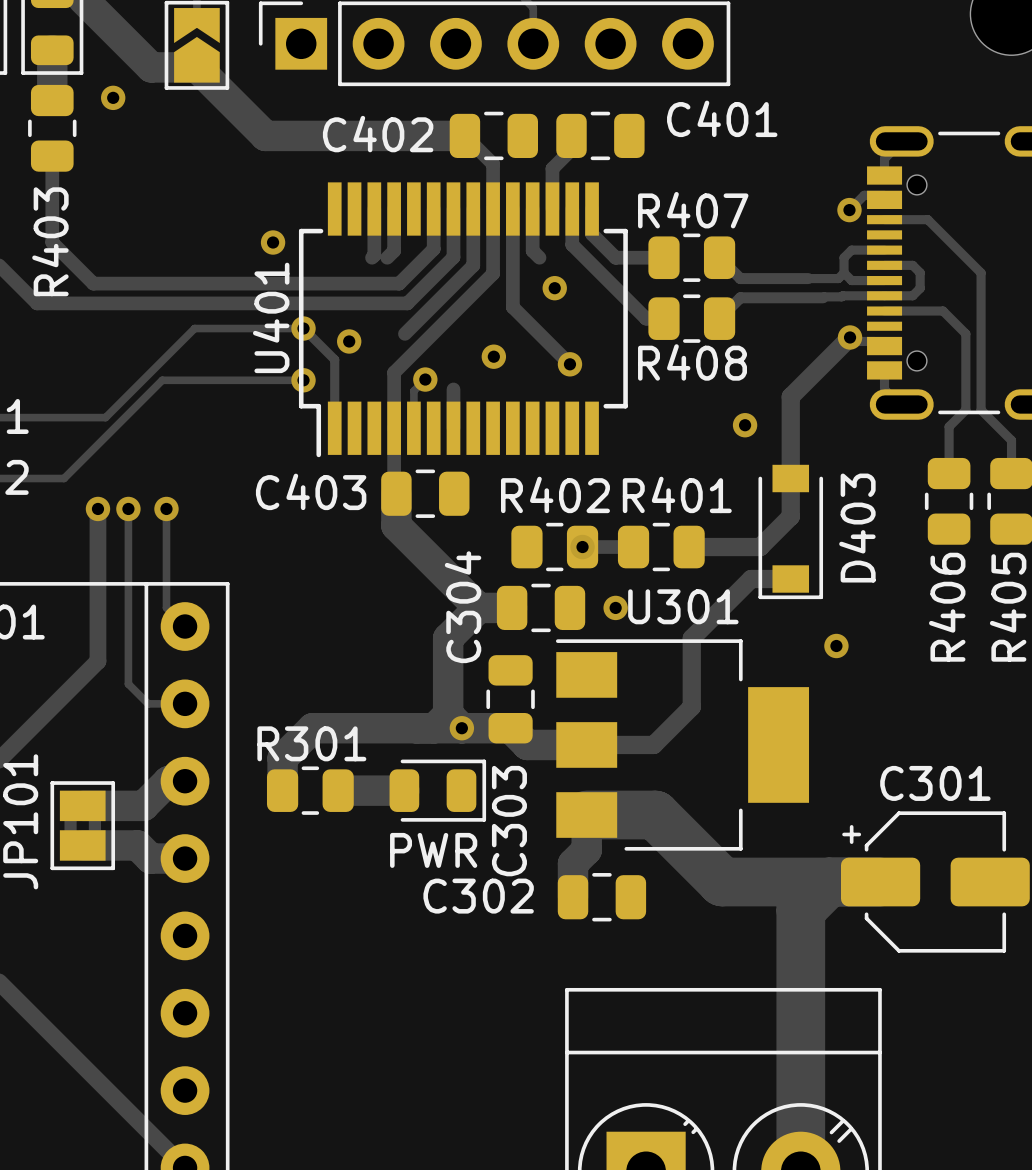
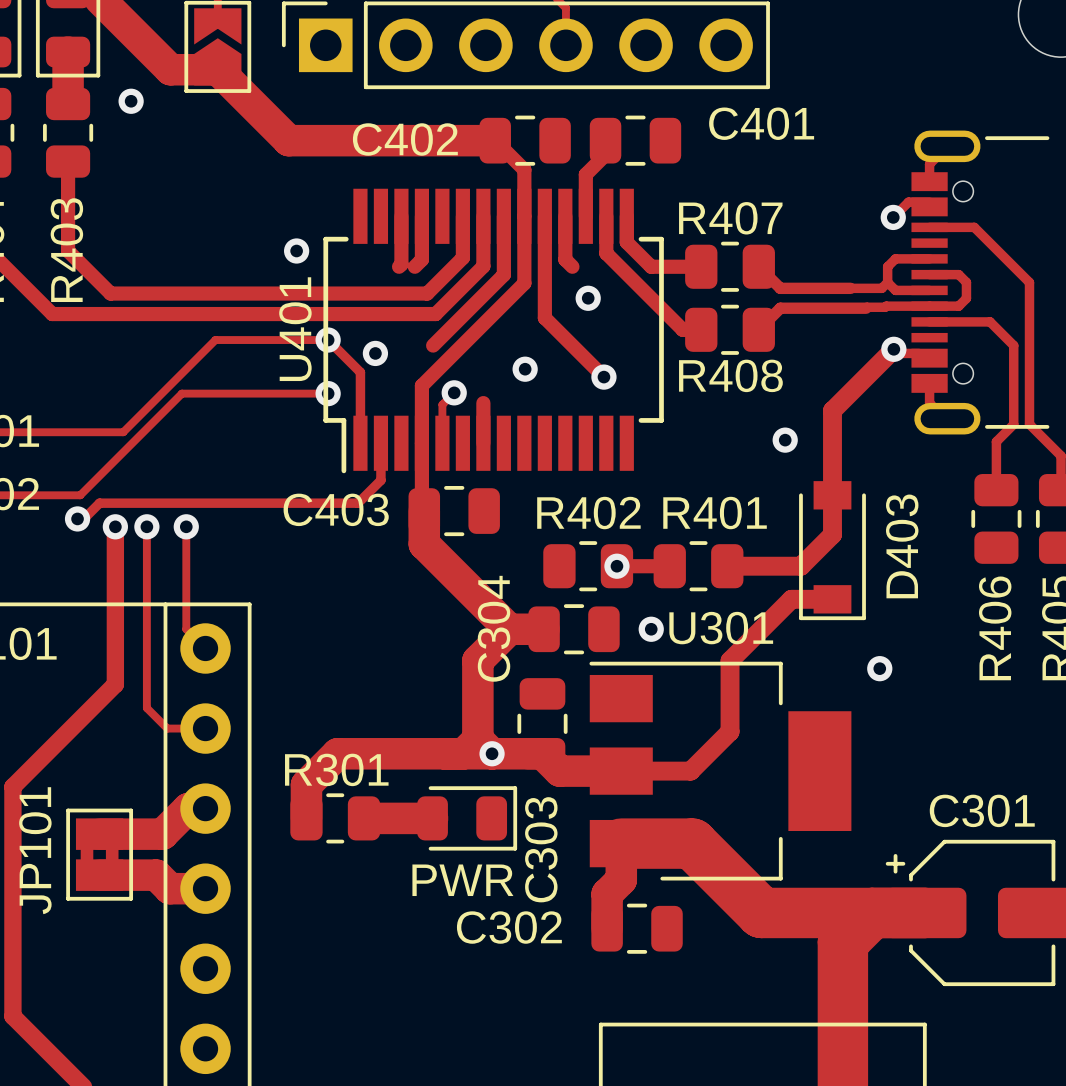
track: none -> (380, 443) (380, 480) (358, 503) (99, 503) (83, 518) (77, 518)
via: none -> (77, 518)

